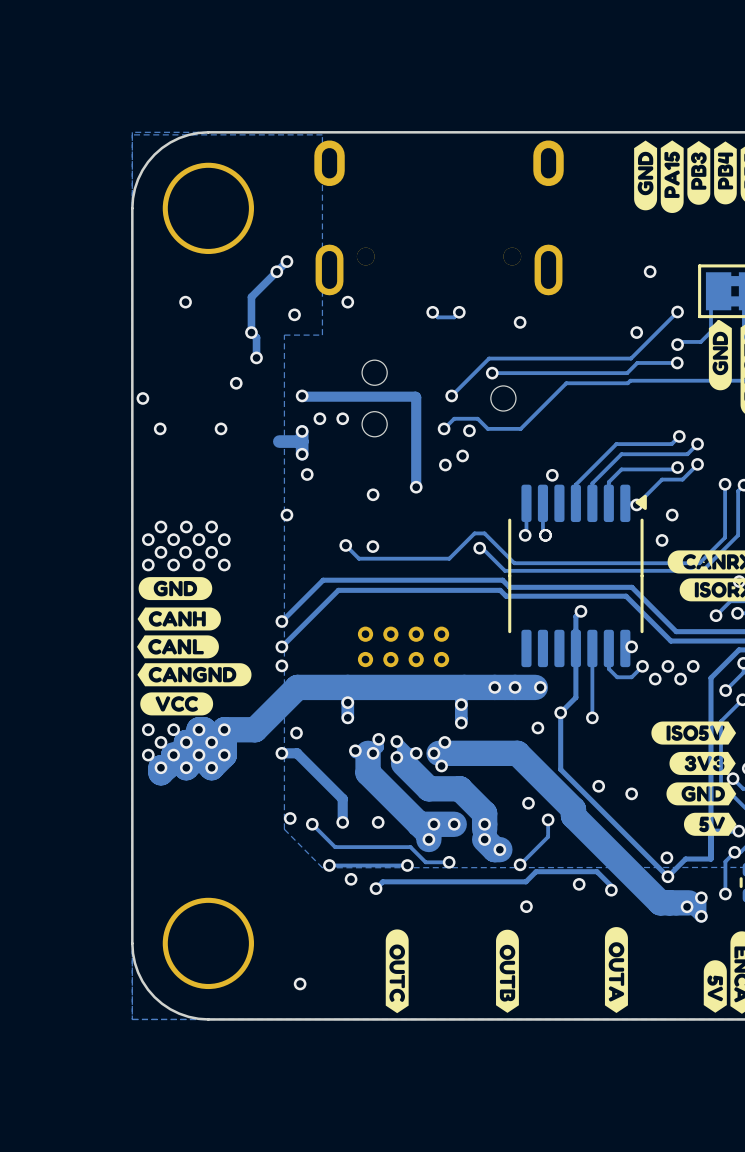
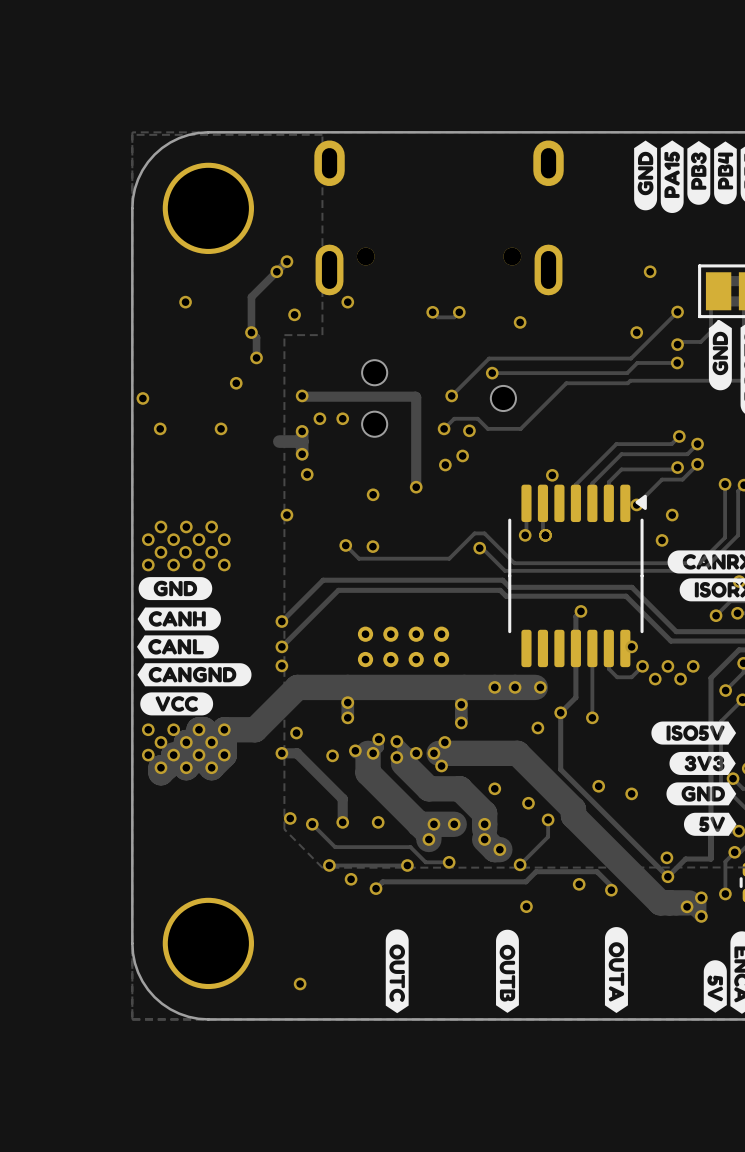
via: none -> (332, 755)
via: none -> (494, 788)

